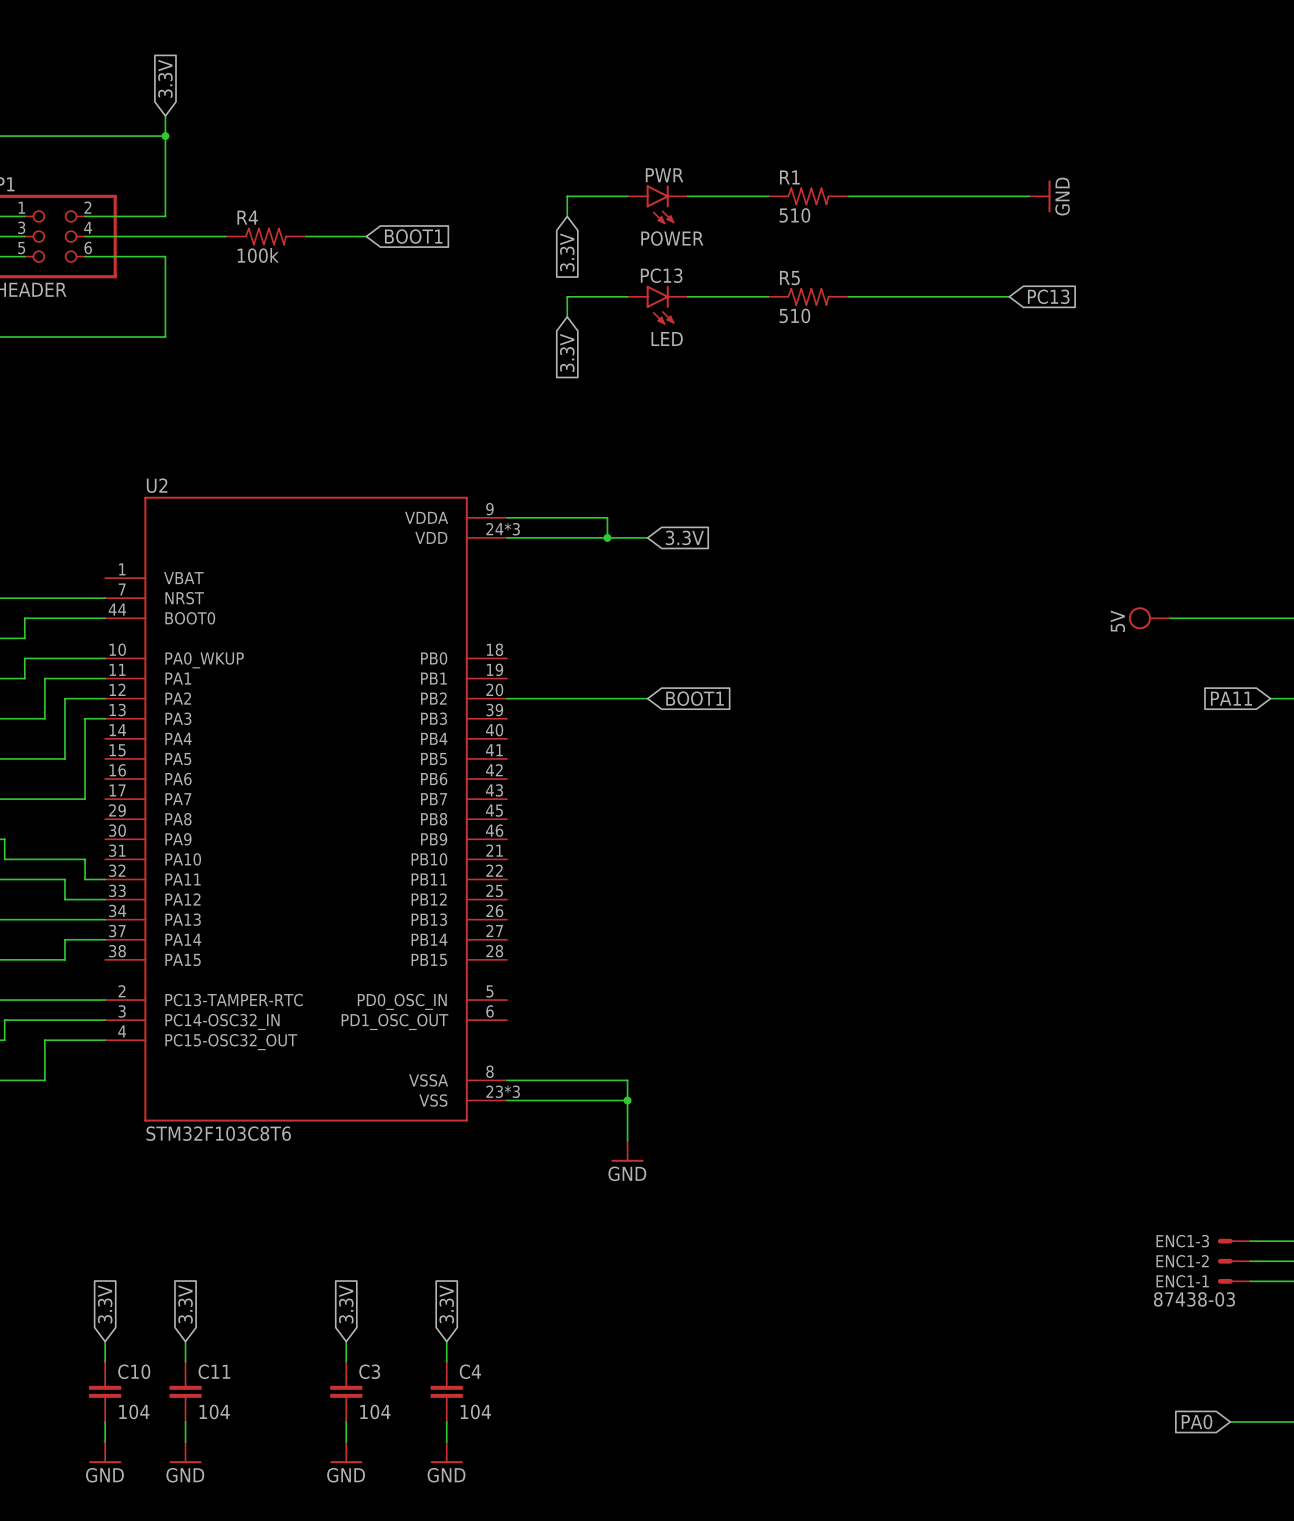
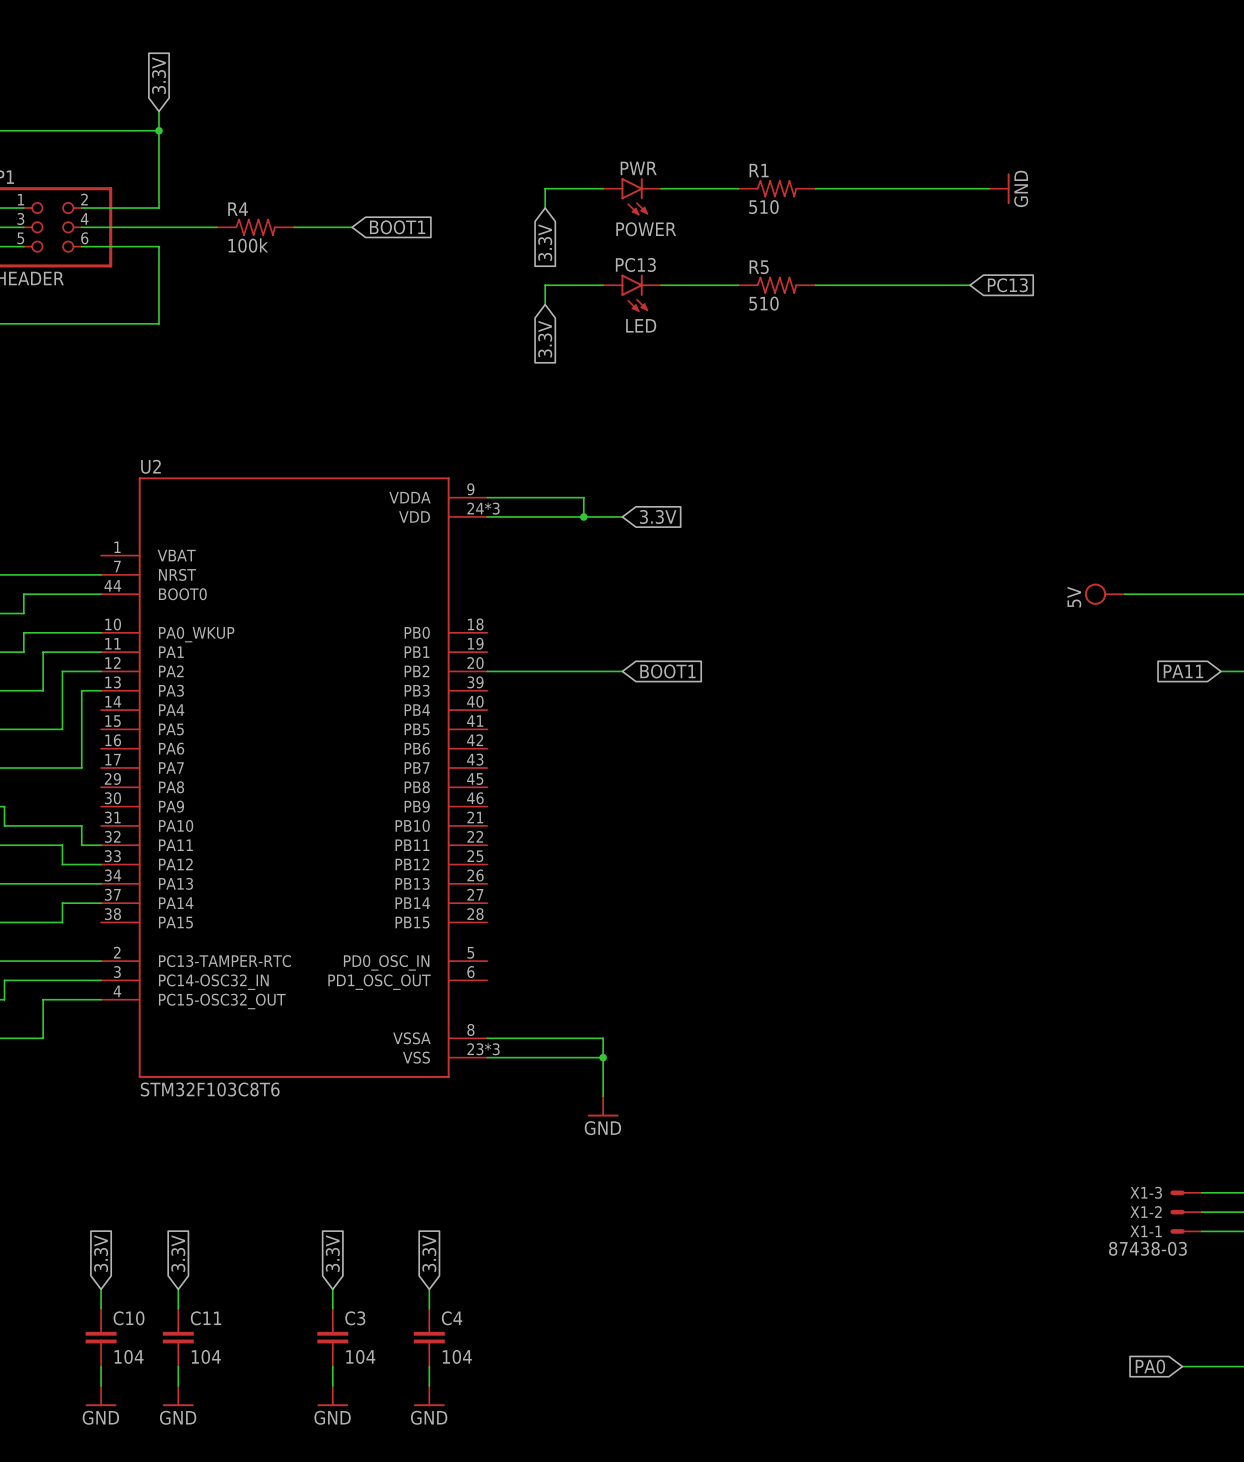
ENC1-3 name: ENC1-3 (1182, 1241) -> X1-3 (1146, 1192)
ENC1-2 name: ENC1-2 (1182, 1261) -> X1-2 (1146, 1212)
ENC1-1 name: ENC1-1 (1182, 1281) -> X1-1 (1146, 1231)

